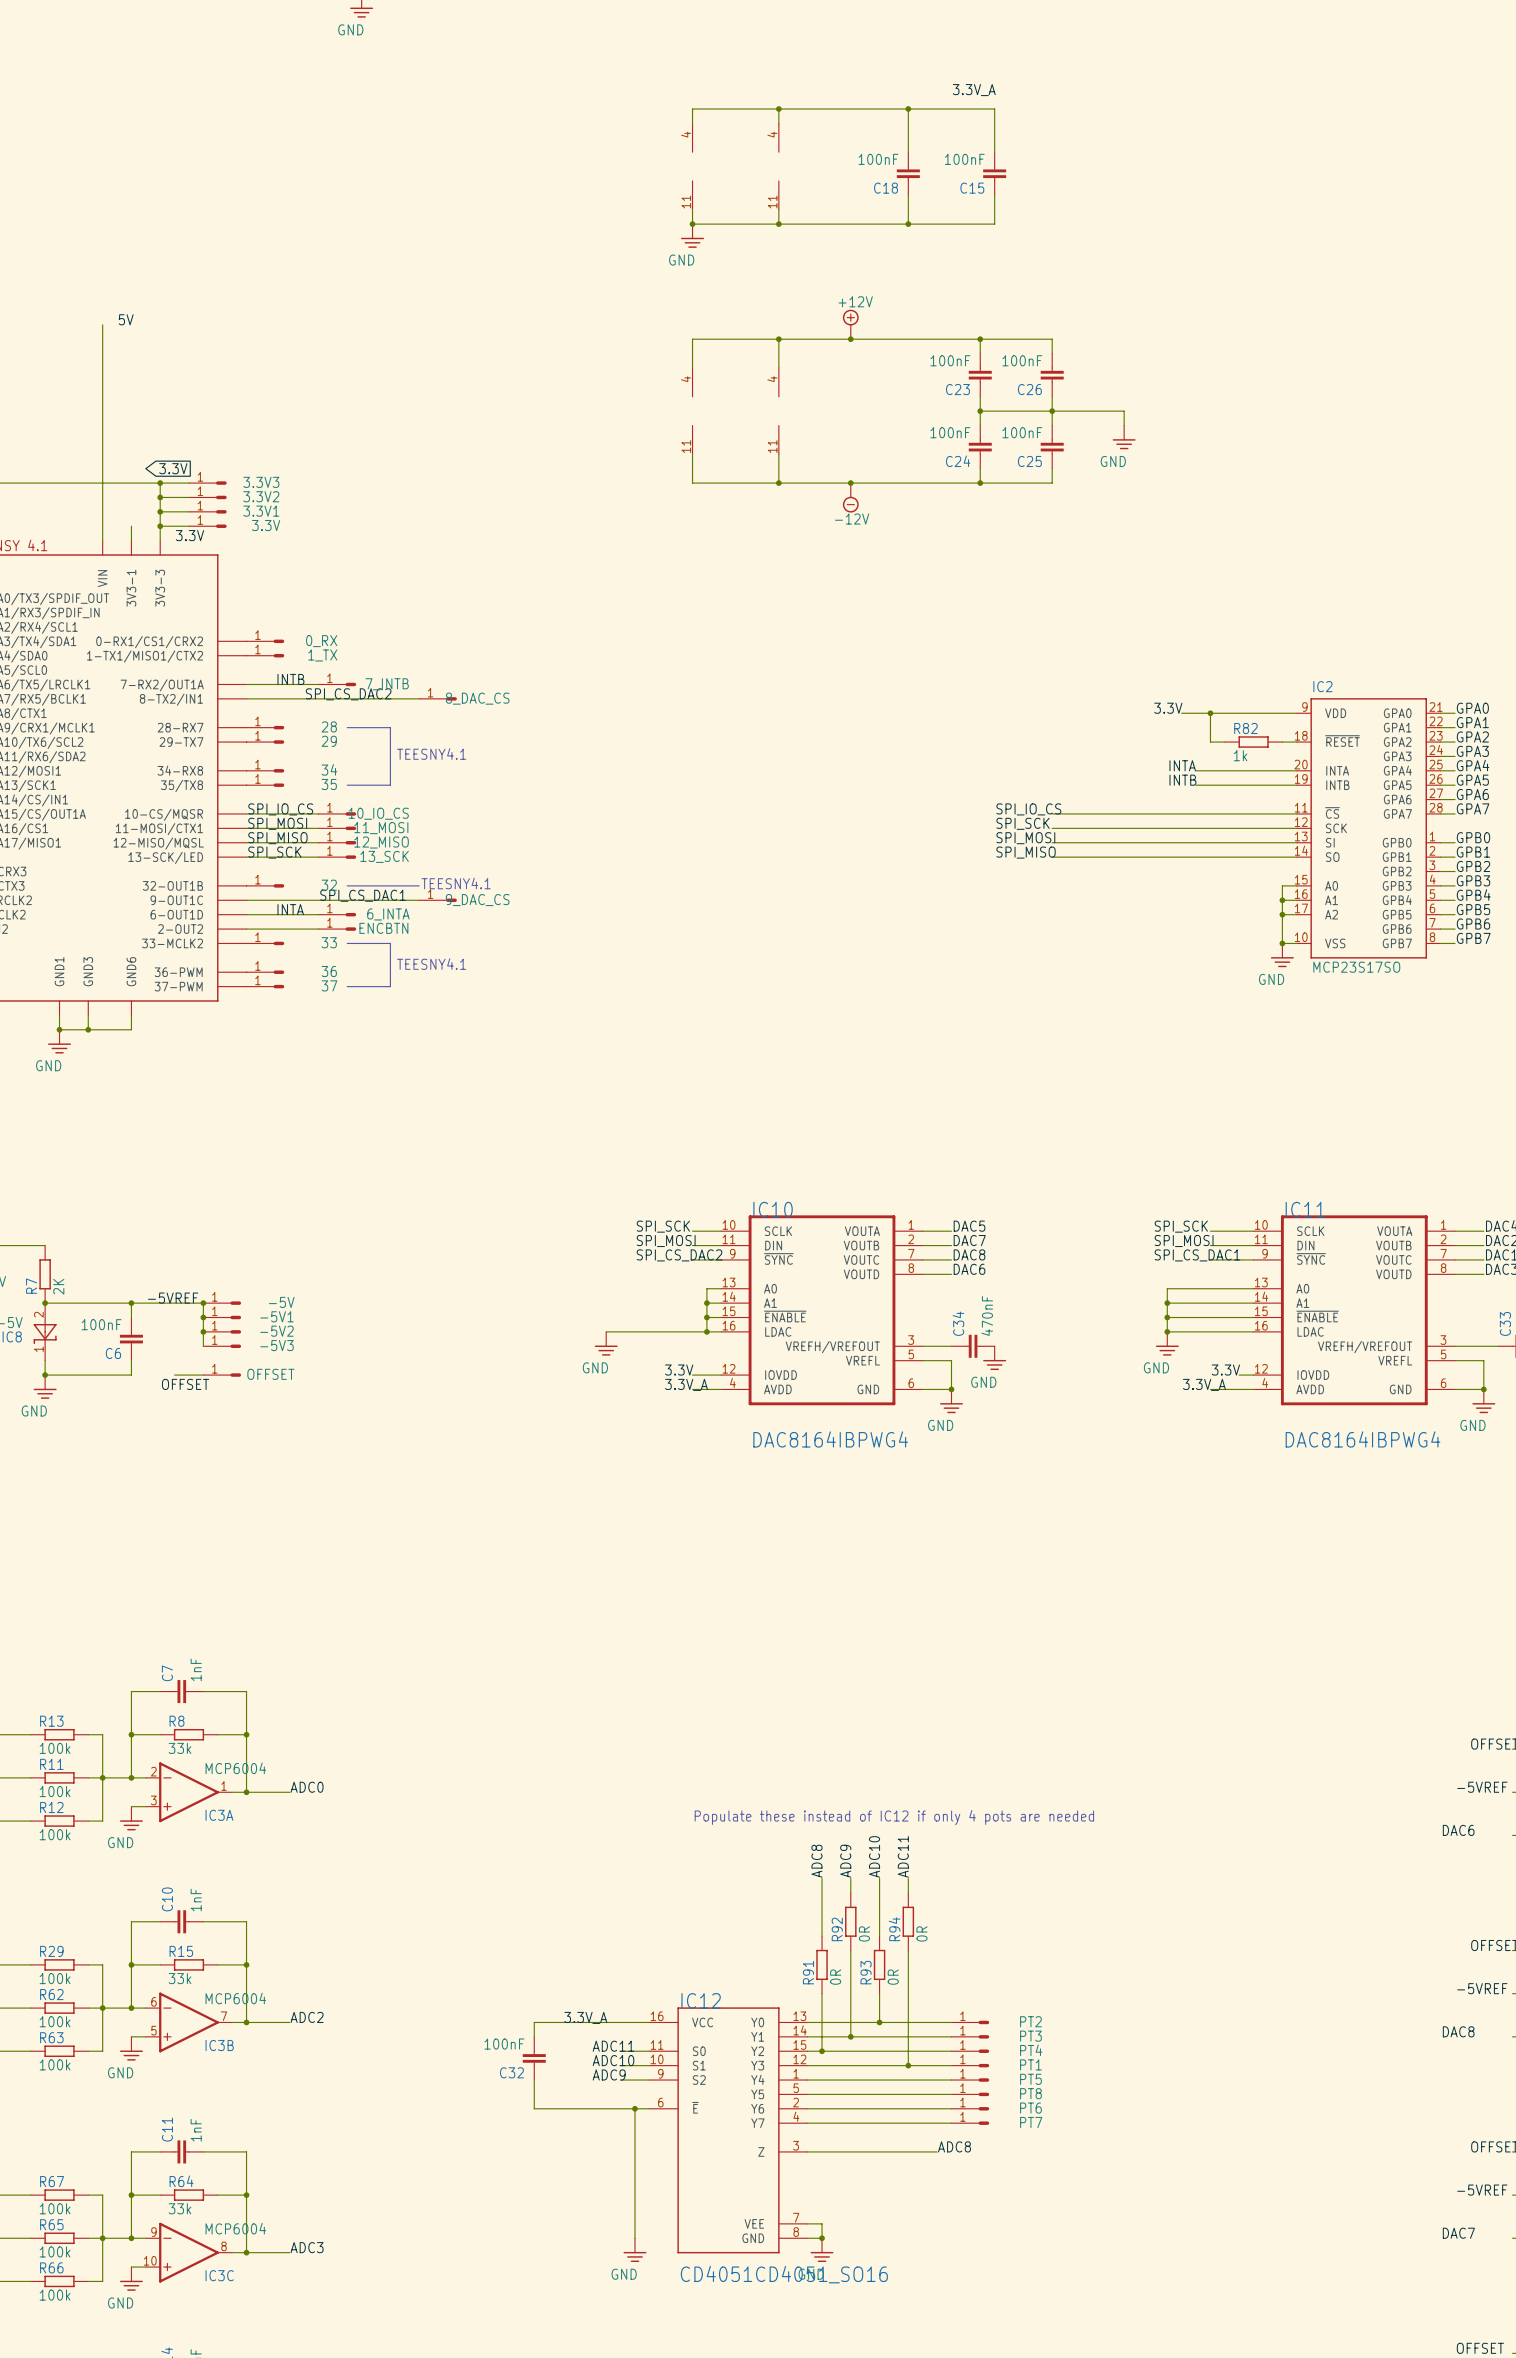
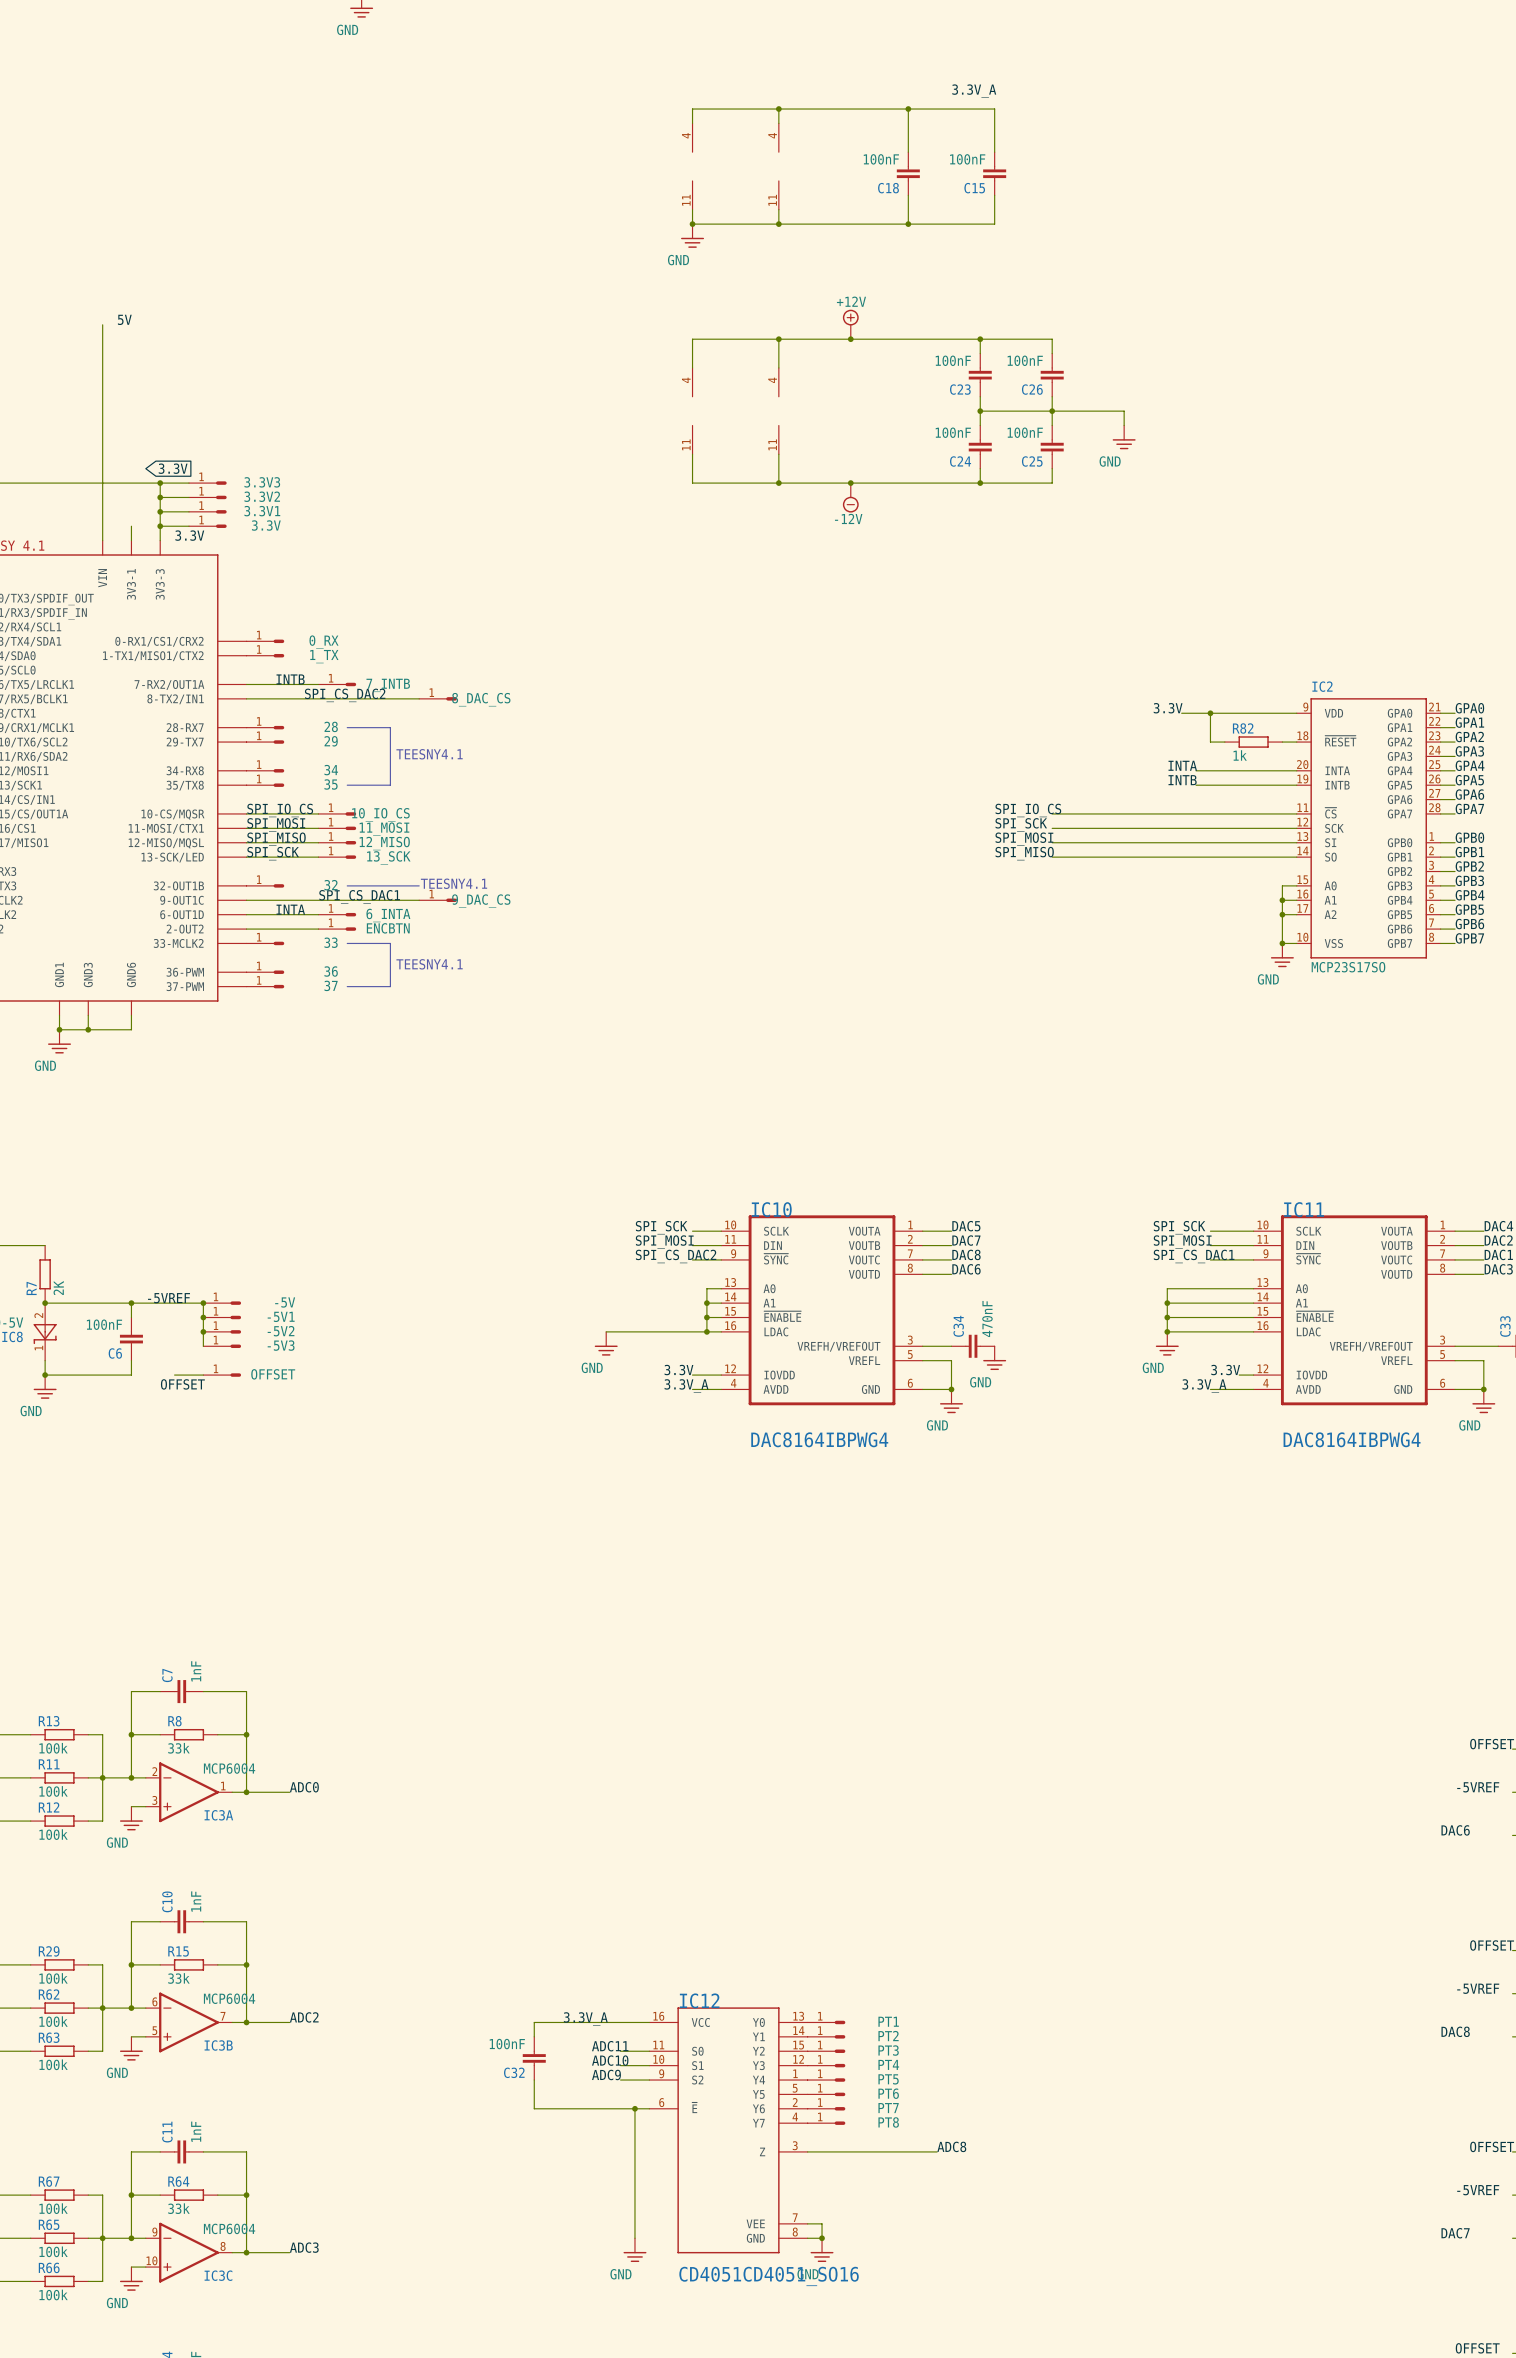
text: Populate these instead of IC12 if only 4 pots are needed (894, 1817) -> none
label: ADC10 (874, 1856) -> none
label: ADC11 (903, 1856) -> none
label: ADC8 (816, 1861) -> none
label: ADC9 (845, 1861) -> none
wire: (822, 1878) (822, 1936) -> none
wire: (850, 1878) (850, 1892) -> none
wire: (879, 1878) (879, 1936) -> none
wire: (908, 1878) (908, 1892) -> none
R92: 0R (850, 1921) -> none
R94: 0R (908, 1921) -> none
wire: (850, 1950) (850, 2036) -> none
wire: (908, 1950) (908, 2065) -> none
R91: 0R (822, 1964) -> none
R93: 0R (879, 1964) -> none
wire: (822, 1993) (822, 2051) -> none
wire: (879, 1993) (879, 2022) -> none
wire: (807, 2022) (951, 2022) -> none
junction: (879, 2022) -> none
PT2 position: (970, 2022) -> (826, 2036)
wire: (807, 2036) (951, 2036) -> none
junction: (850, 2036) -> none
PT3 position: (970, 2036) -> (826, 2051)
wire: (807, 2051) (951, 2051) -> none
junction: (822, 2051) -> none
PT4 position: (970, 2051) -> (826, 2065)
wire: (807, 2065) (951, 2065) -> none
junction: (908, 2065) -> none
PT1 position: (970, 2065) -> (826, 2022)
wire: (807, 2080) (951, 2080) -> none
PT5 position: (970, 2080) -> (826, 2080)
wire: (807, 2094) (951, 2094) -> none
PT8 position: (970, 2094) -> (826, 2123)
wire: (807, 2108) (951, 2108) -> none
PT6 position: (970, 2108) -> (826, 2094)
wire: (807, 2123) (951, 2123) -> none
PT7 position: (970, 2123) -> (826, 2108)

